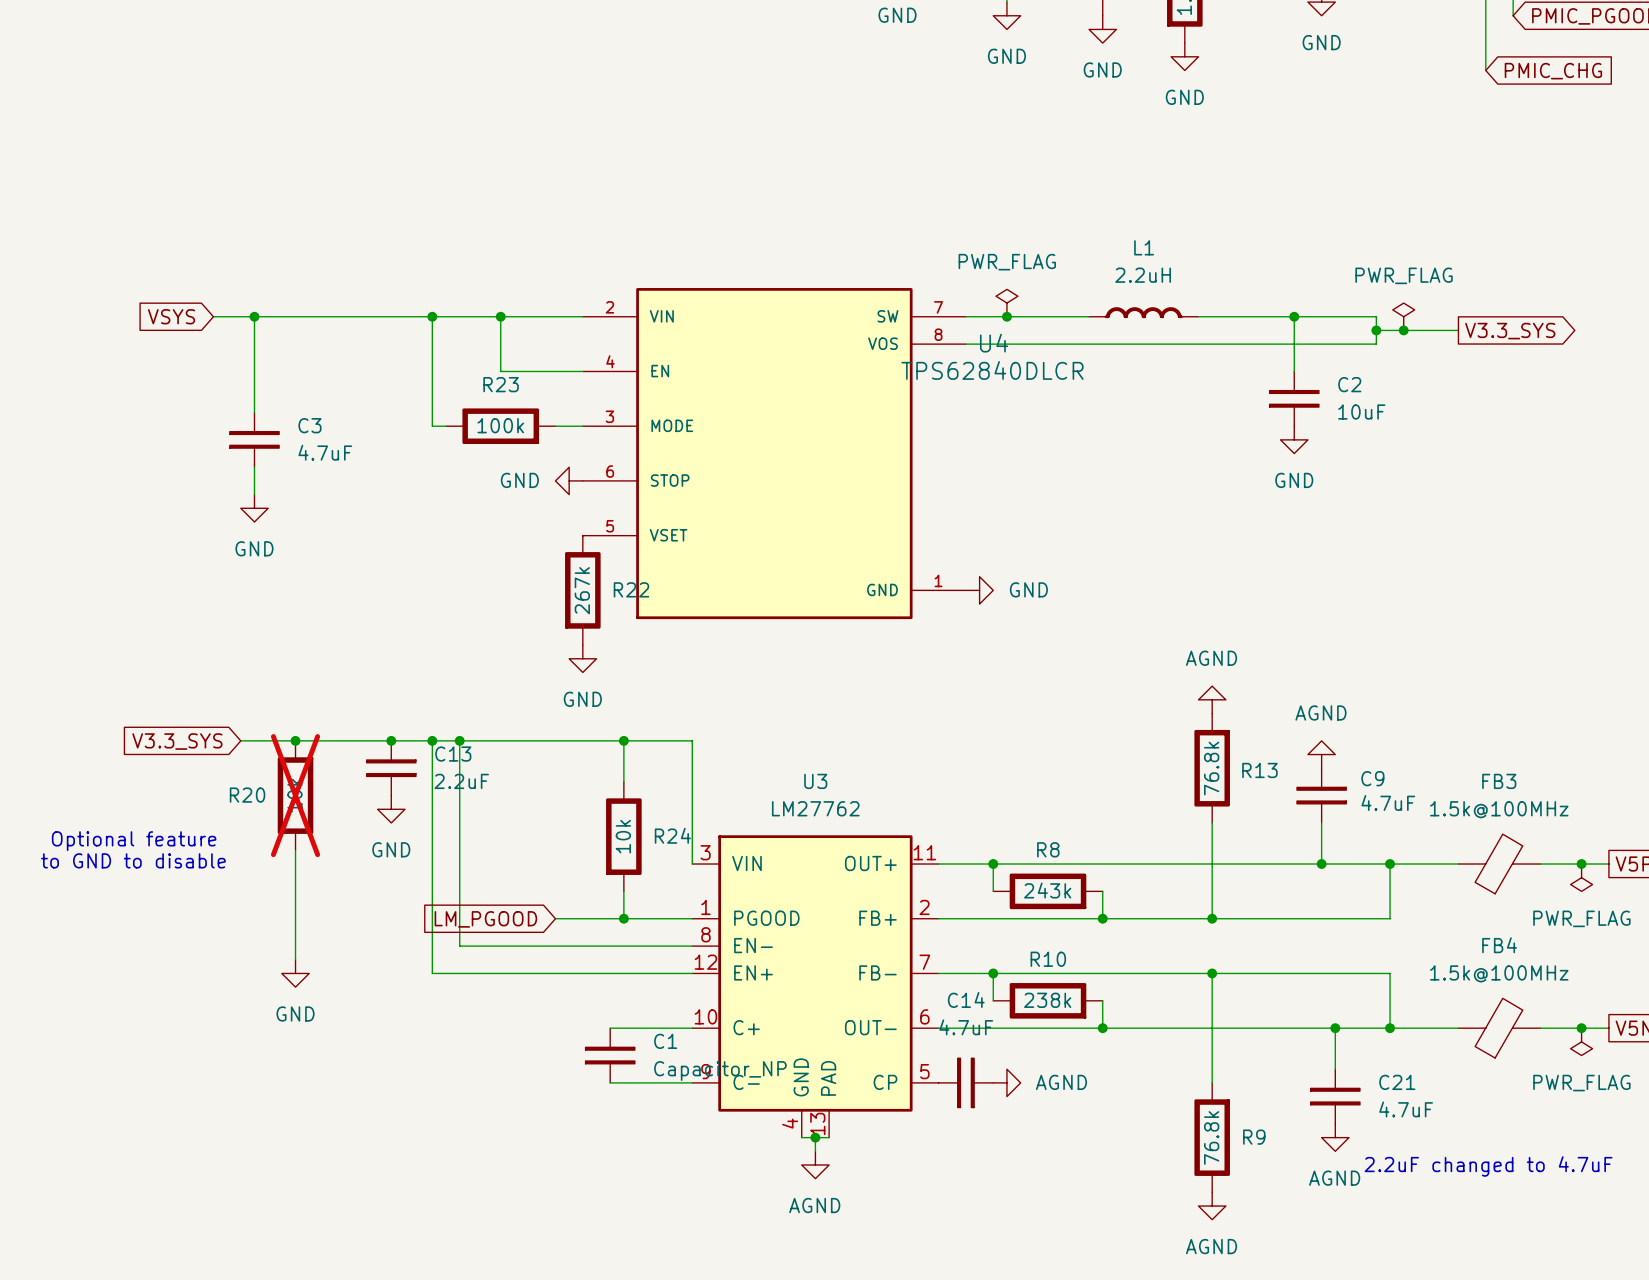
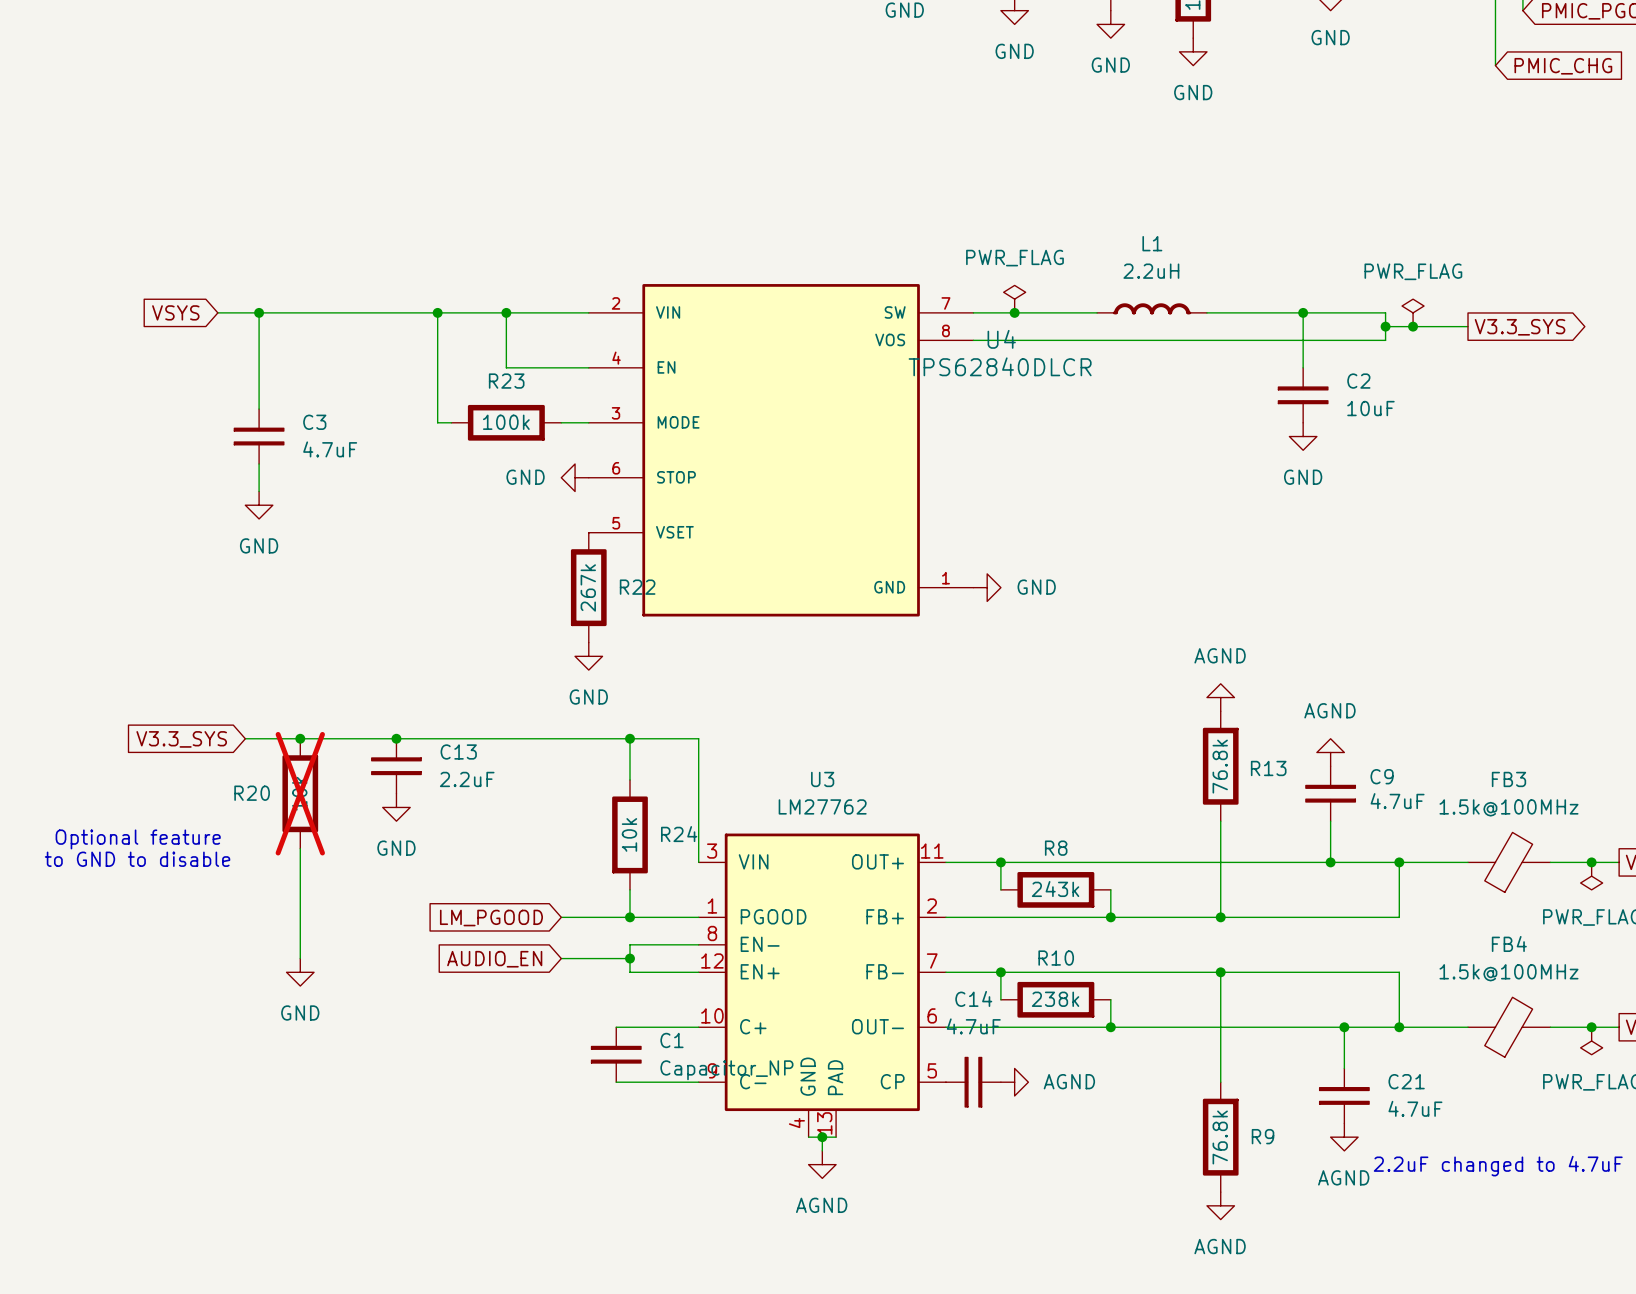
wire: (432, 740) (432, 973) (623, 973) -> (630, 944) (630, 972)
junction: (432, 740) -> none
wire: (459, 740) (459, 946) (623, 946) -> none
junction: (459, 740) -> none
wire: none -> (561, 958) (630, 958)
junction: none -> (630, 958)
global label: none -> AUDIO_EN (494, 959)

